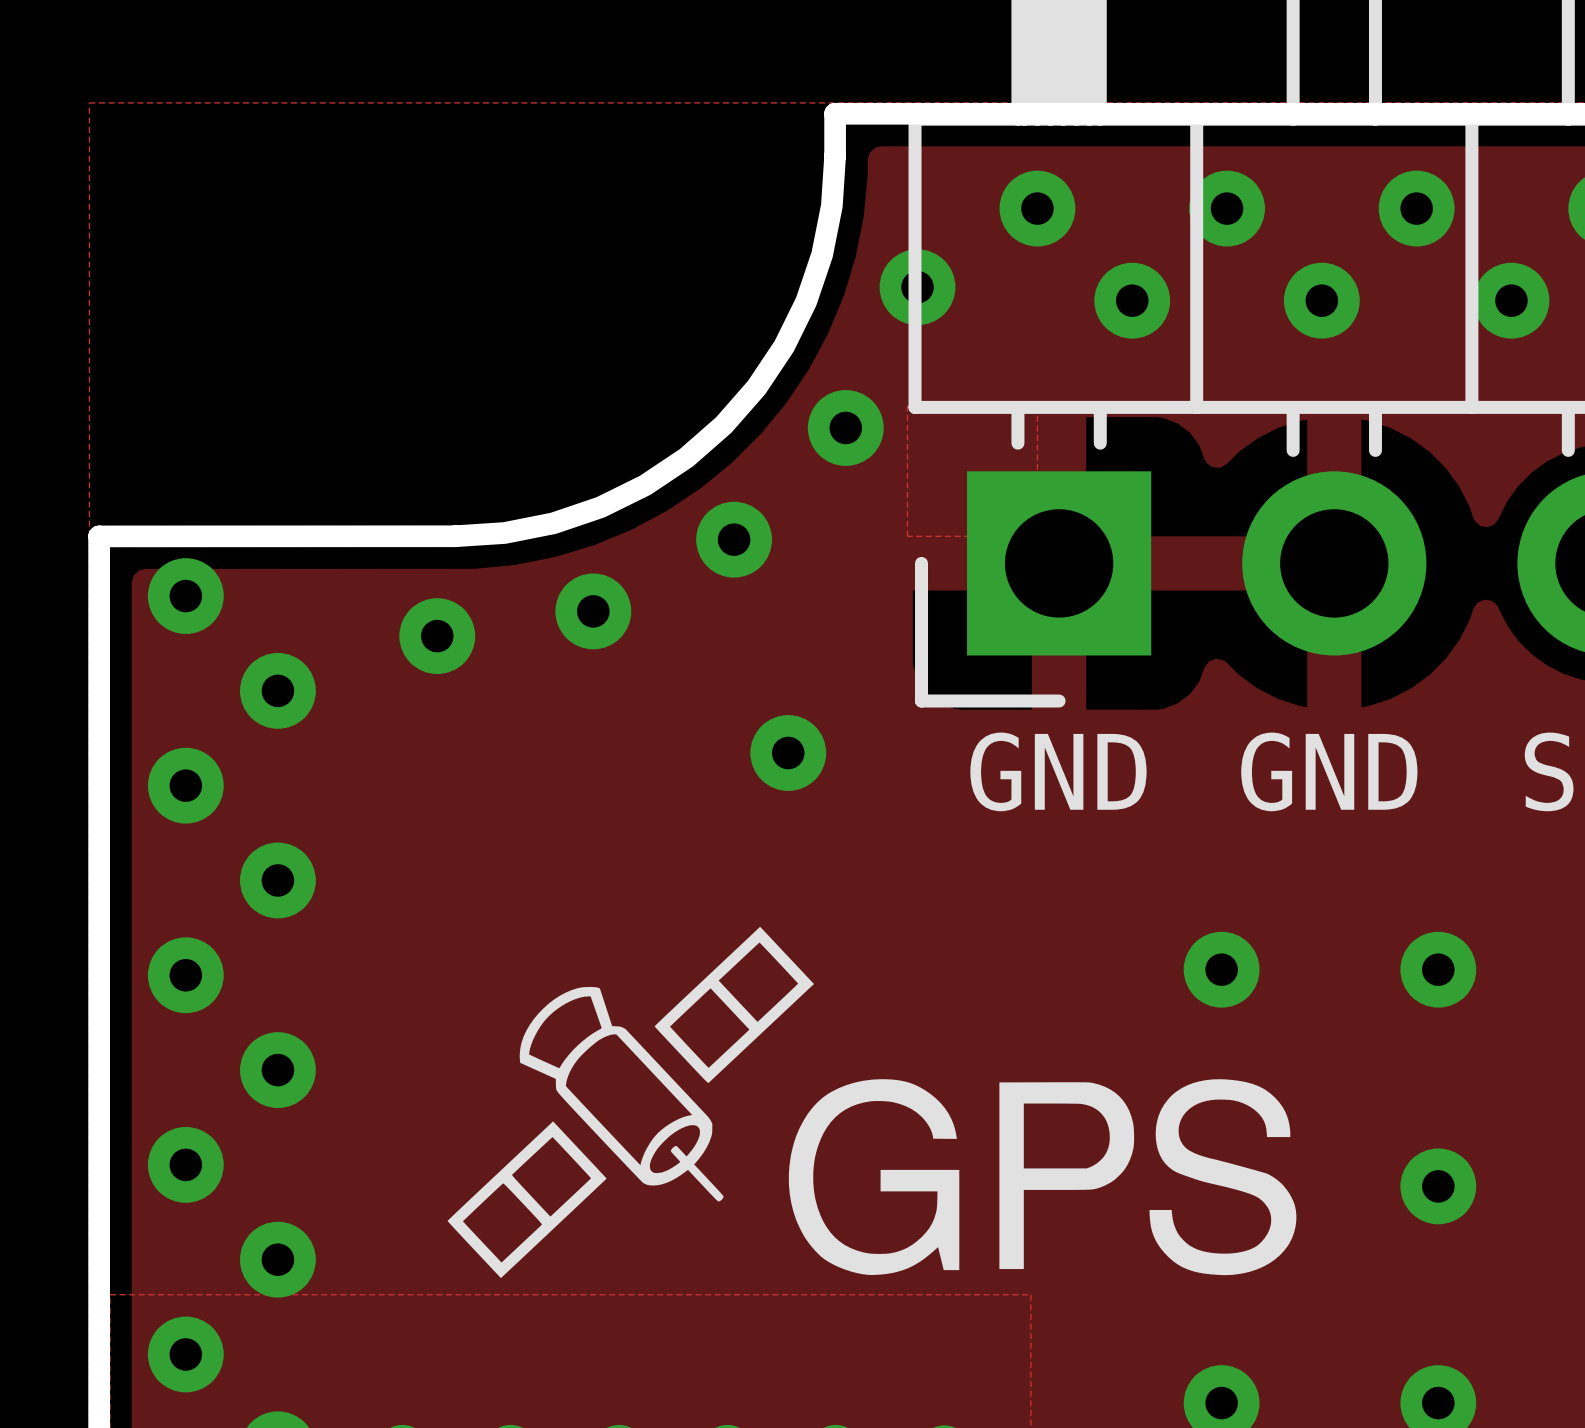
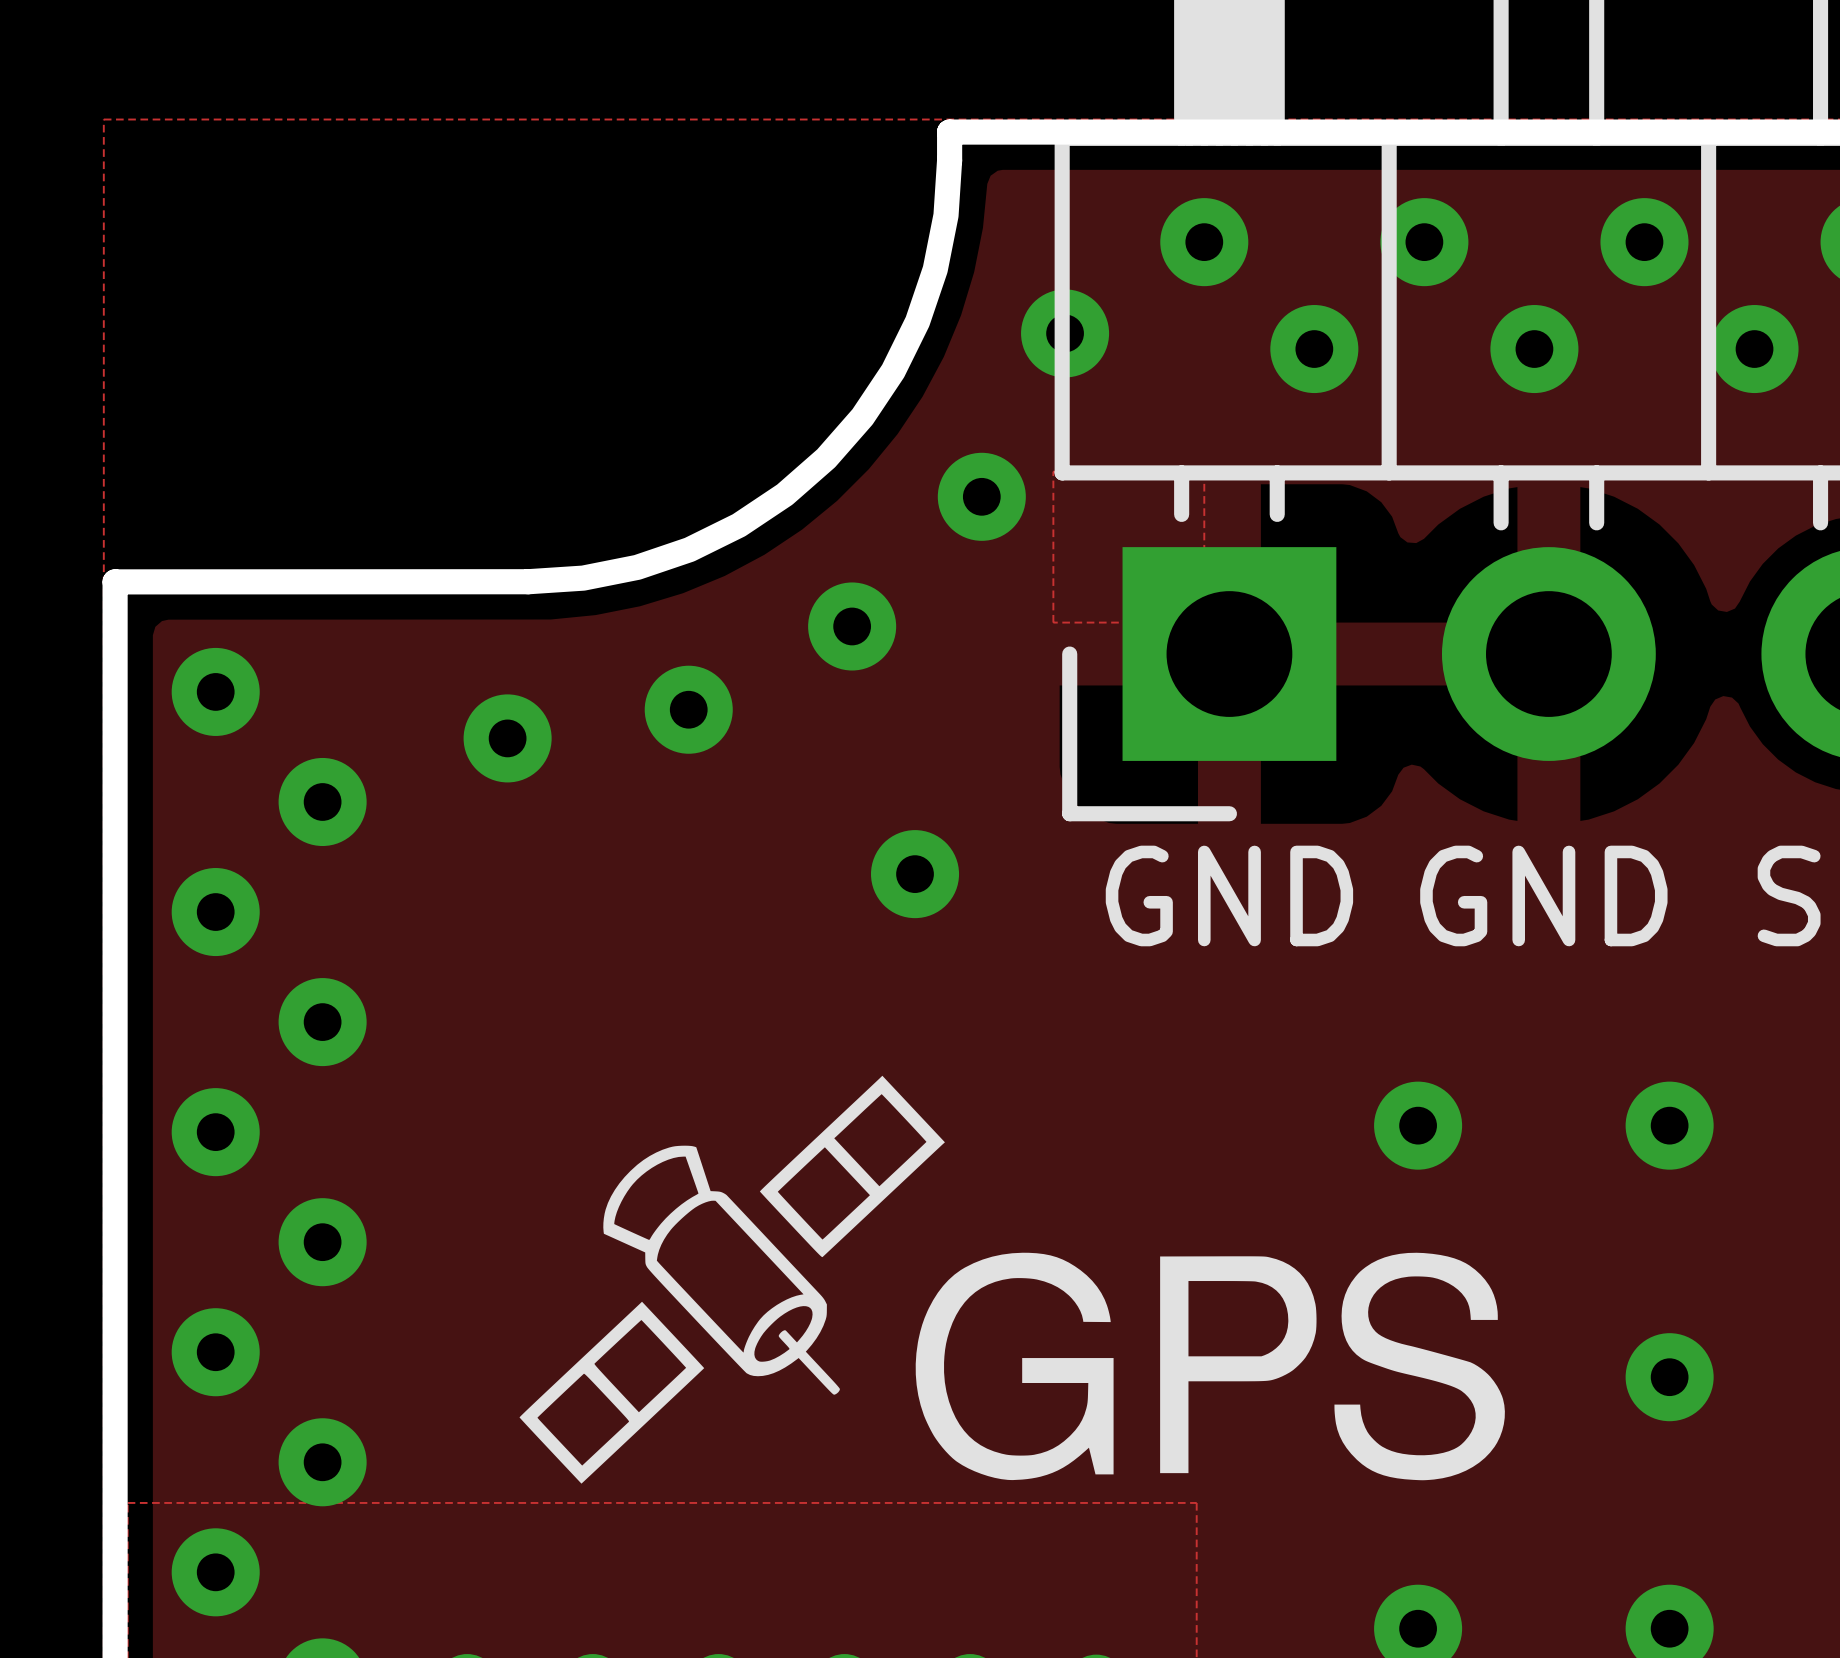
board edge: (835, 113) (831, 205) (822, 254) (806, 301) (784, 346) (756, 387) (723, 424) (686, 457) (645, 485) (600, 507) (553, 523) (504, 533) (455, 536) (99, 536) -> (969, 132) (949, 132) (946, 215) (935, 269) (917, 321) (893, 371) (862, 416) (826, 458) (784, 494) (738, 525) (689, 549) (637, 567) (583, 578) (528, 581) (115, 581) (115, 622)

